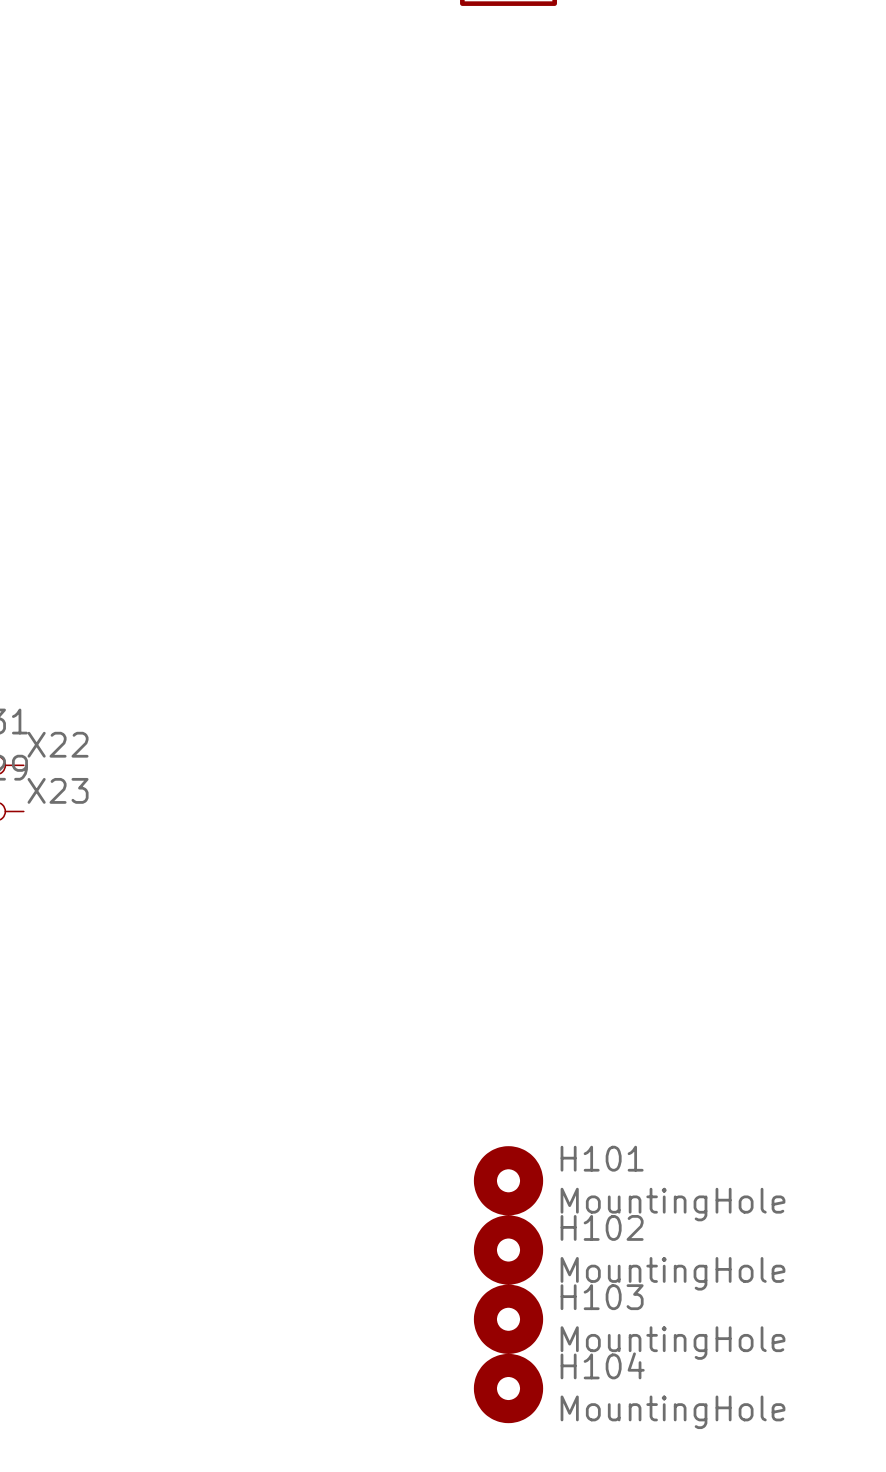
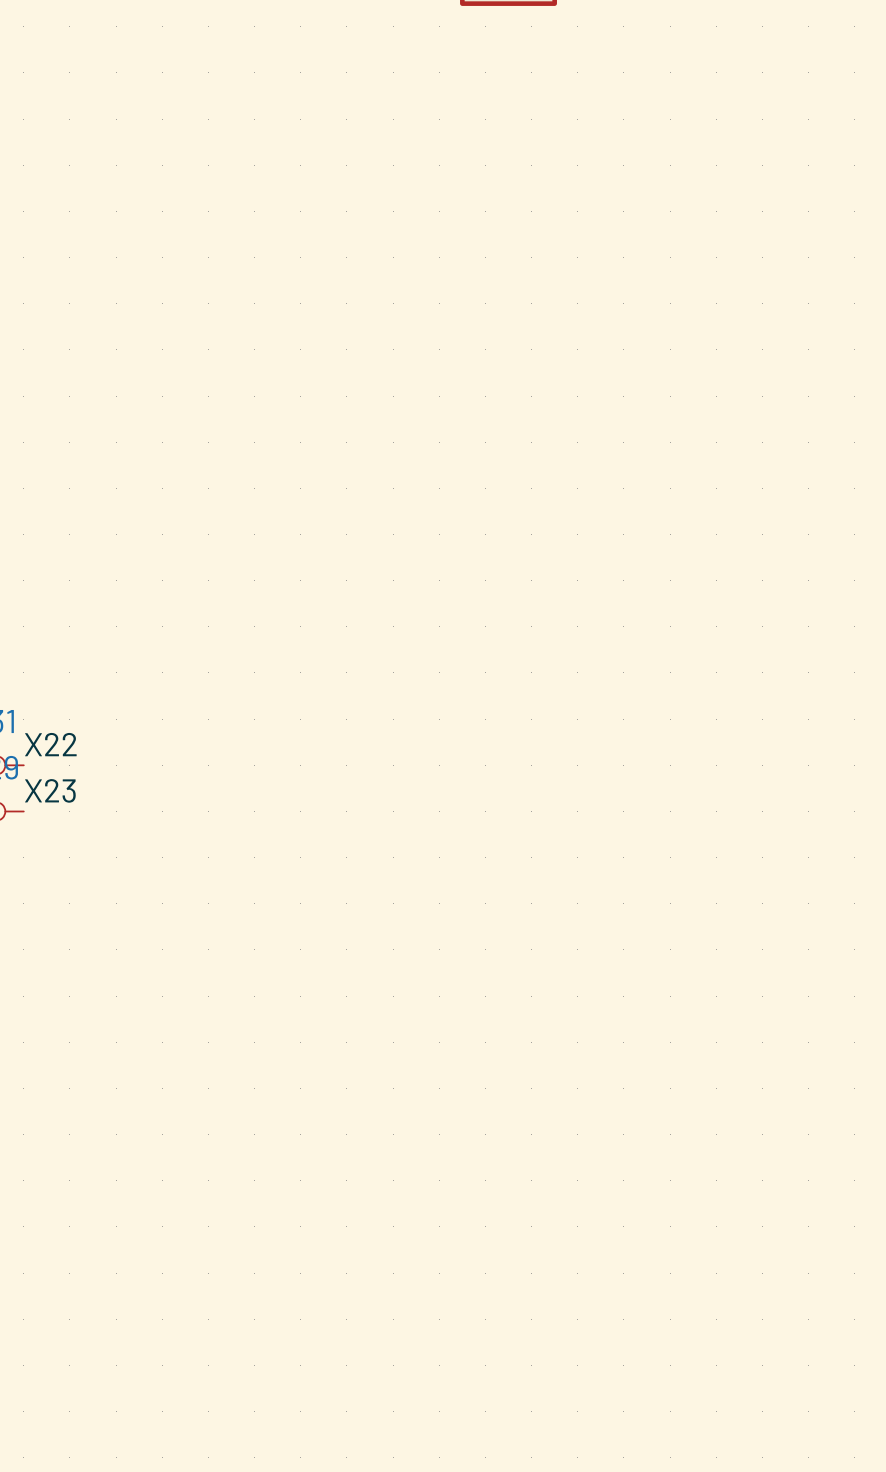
H101: MountingHole (508, 1180) -> none
H102: MountingHole (508, 1250) -> none
H103: MountingHole (508, 1319) -> none
H104: MountingHole (508, 1388) -> none

